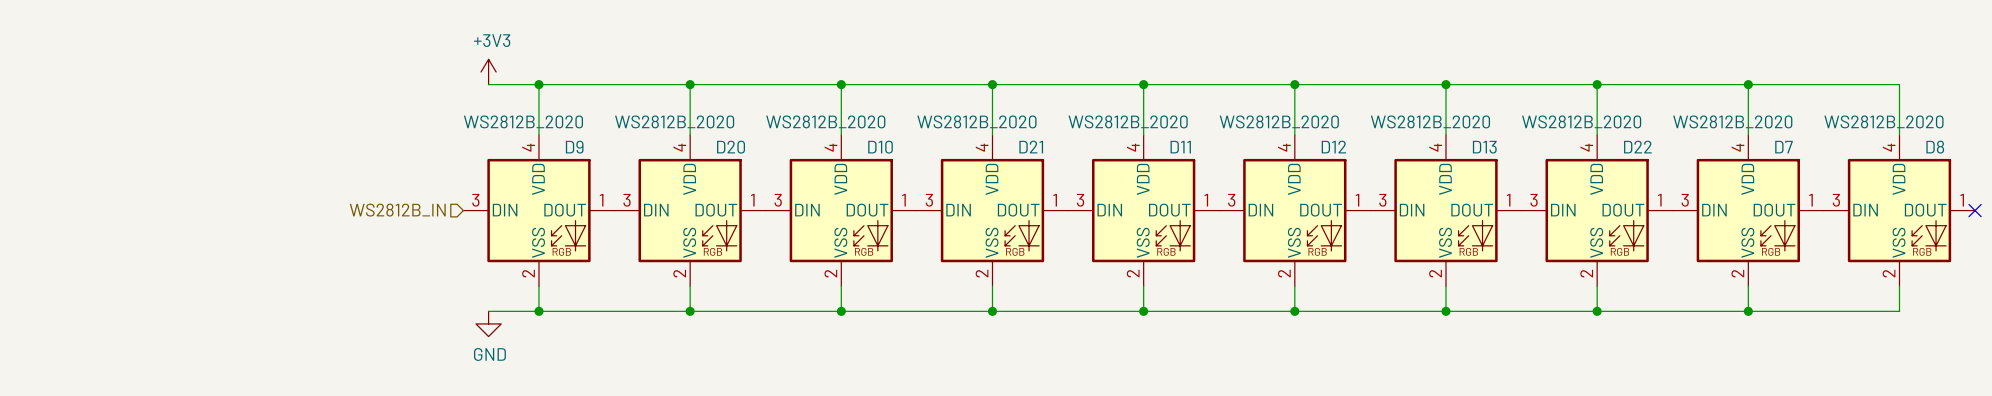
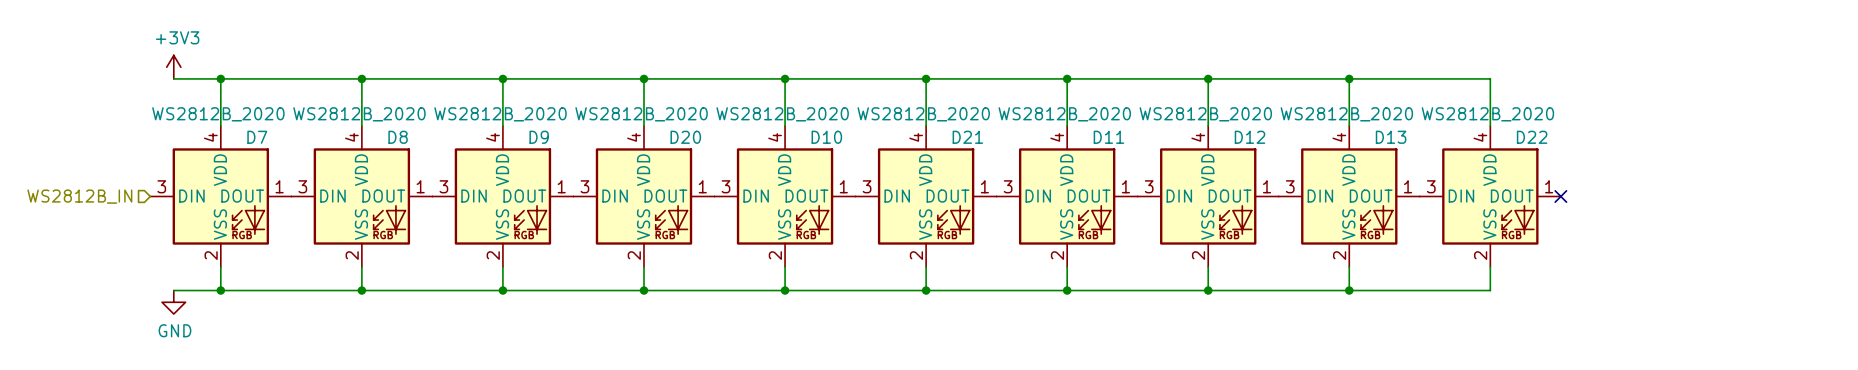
power symbol: none -> +3V3 (173, 67)
power symbol: +3V3 (488, 72) -> none
wire: none -> (173, 78) (455, 78)
wire: none -> (220, 78) (220, 125)
junction: none -> (220, 78)
wire: none -> (361, 78) (361, 125)
junction: none -> (361, 78)
wire: (1597, 84) (1899, 84) (1899, 134) -> none
junction: (1597, 84) -> none
wire: (1748, 84) (1748, 134) -> none
junction: (1748, 84) -> none
hierarchical label: none -> WS2812B_IN (79, 196)
hierarchical label: WS2812B_IN (397, 210) -> none
no-connect mark: none -> (1560, 196)
D7 position: (1748, 210) -> (220, 196)
D8 position: (1899, 210) -> (361, 196)
no-connect mark: (1975, 210) -> none
wire: none -> (220, 267) (220, 290)
wire: none -> (361, 267) (361, 290)
wire: (1748, 286) (1748, 311) -> none
wire: (1899, 286) (1899, 311) (1597, 311) -> none
wire: none -> (173, 290) (455, 290)
junction: none -> (220, 290)
junction: none -> (361, 290)
junction: (1597, 311) -> none
junction: (1748, 311) -> none
power symbol: none -> GND (173, 302)
power symbol: GND (488, 323) -> none

